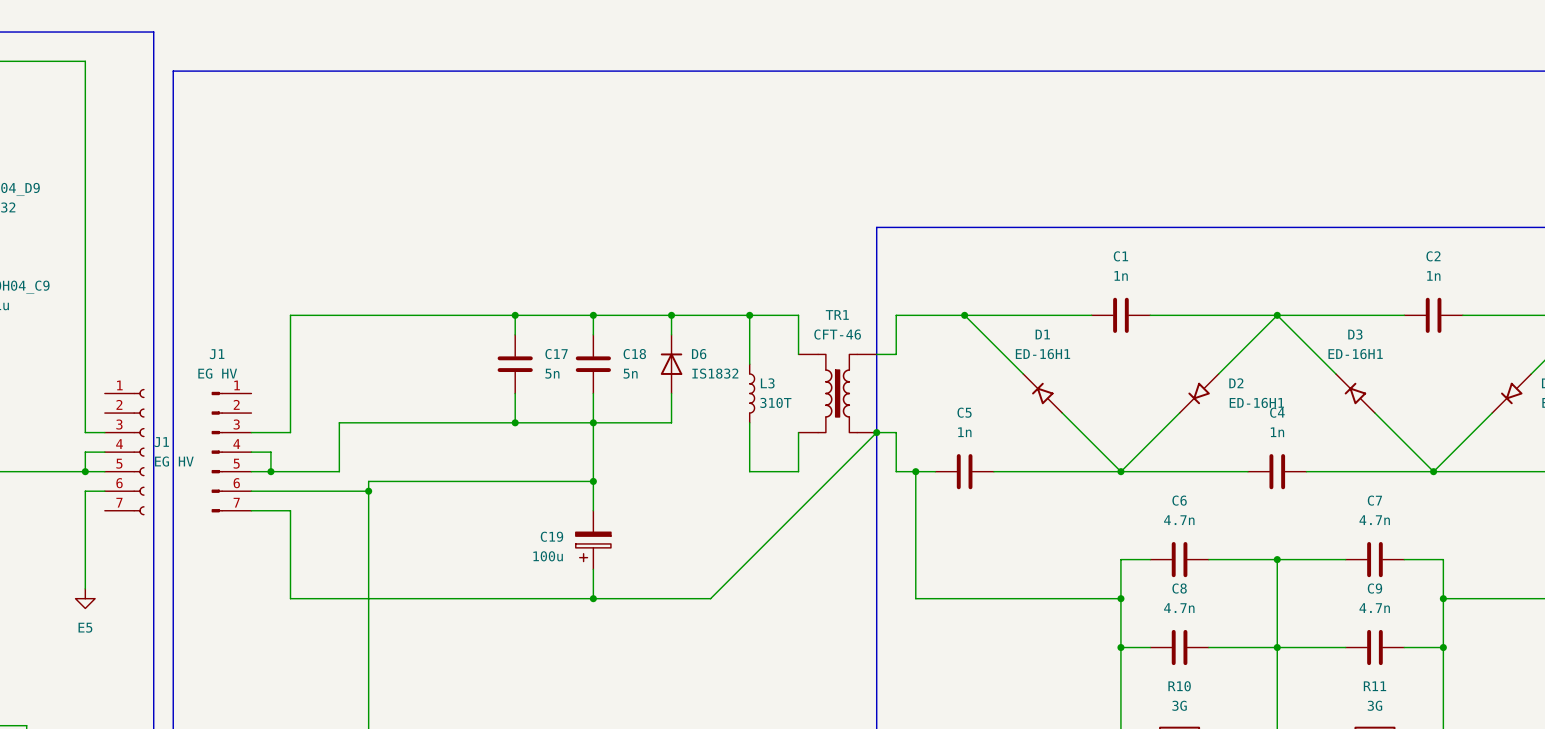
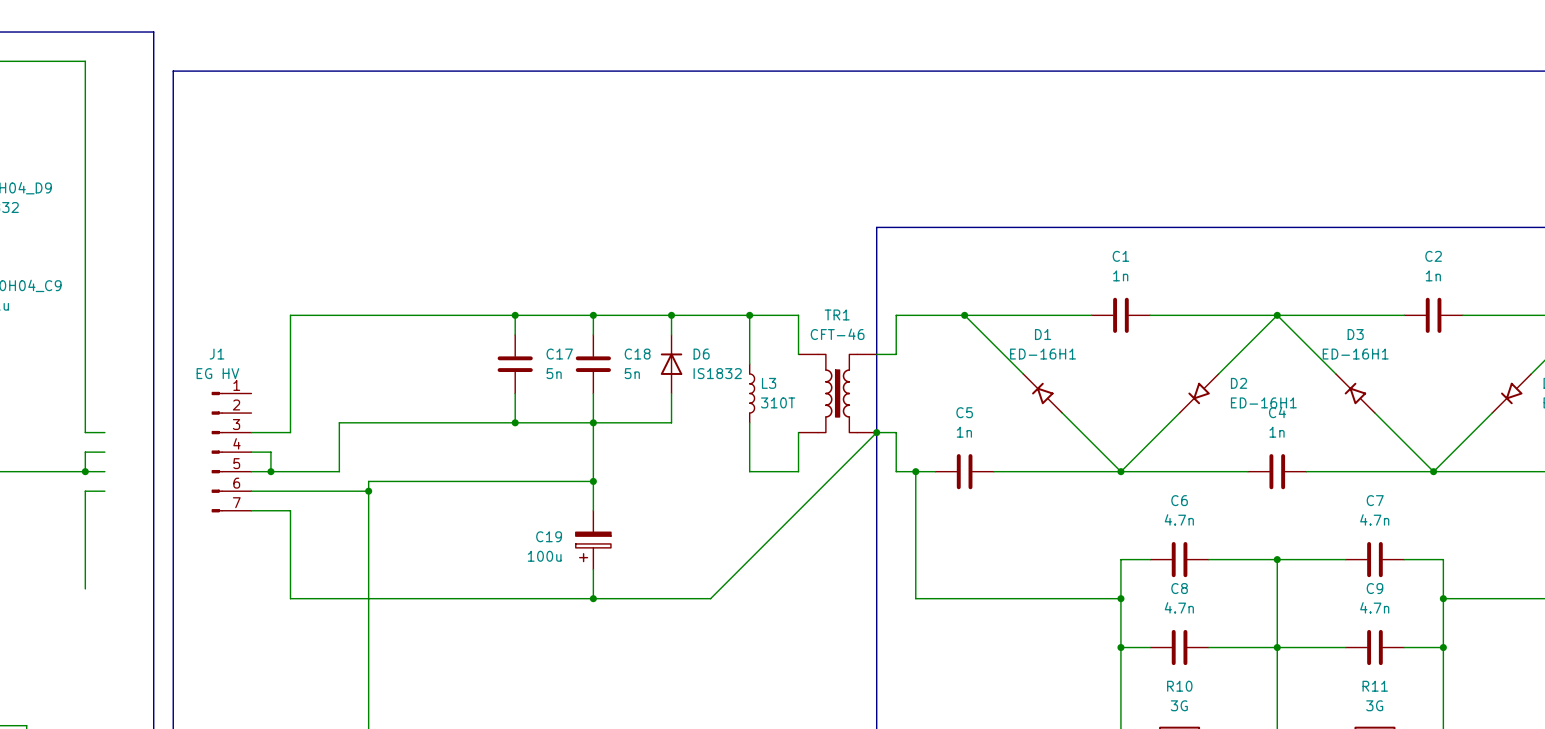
J1: EG HV (124, 452) -> none
power symbol: E5 (85, 598) -> none

